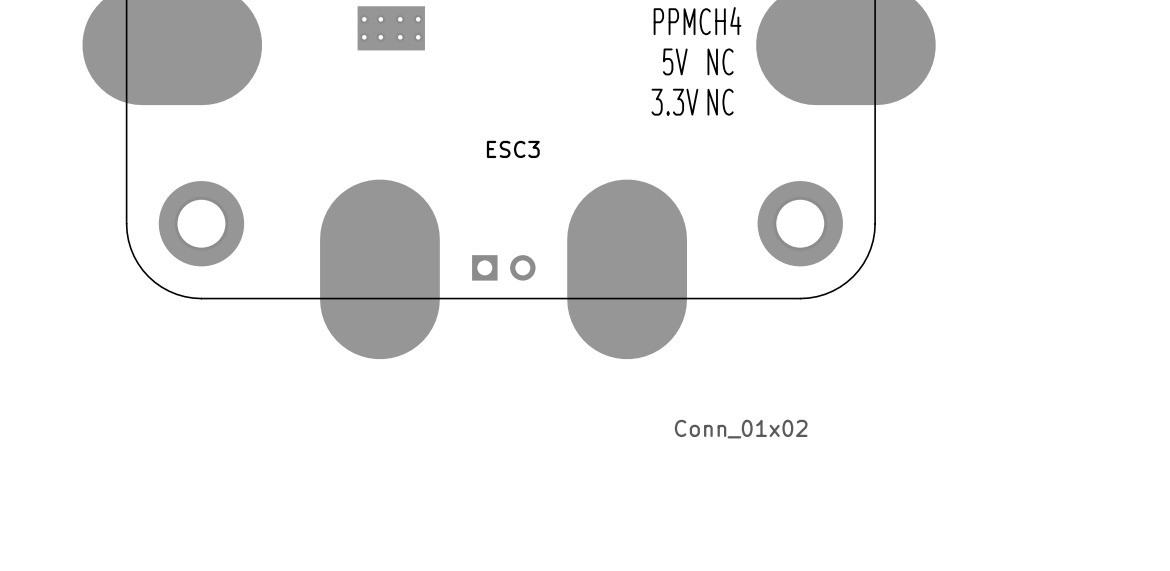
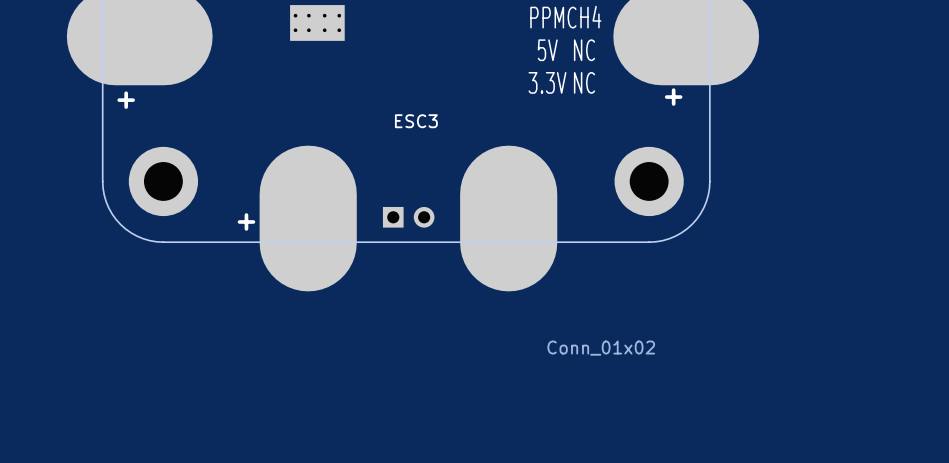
text: none -> + (673, 97)
text: none -> + (126, 100)
text: none -> + (246, 221)

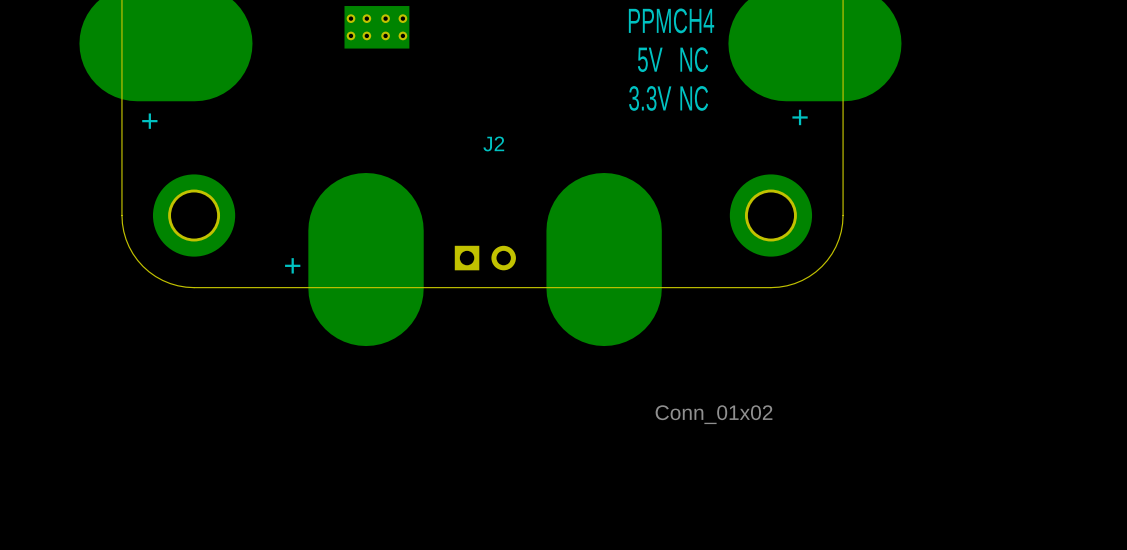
ESC3 name: ESC3 (416, 121) -> J2 (493, 143)

